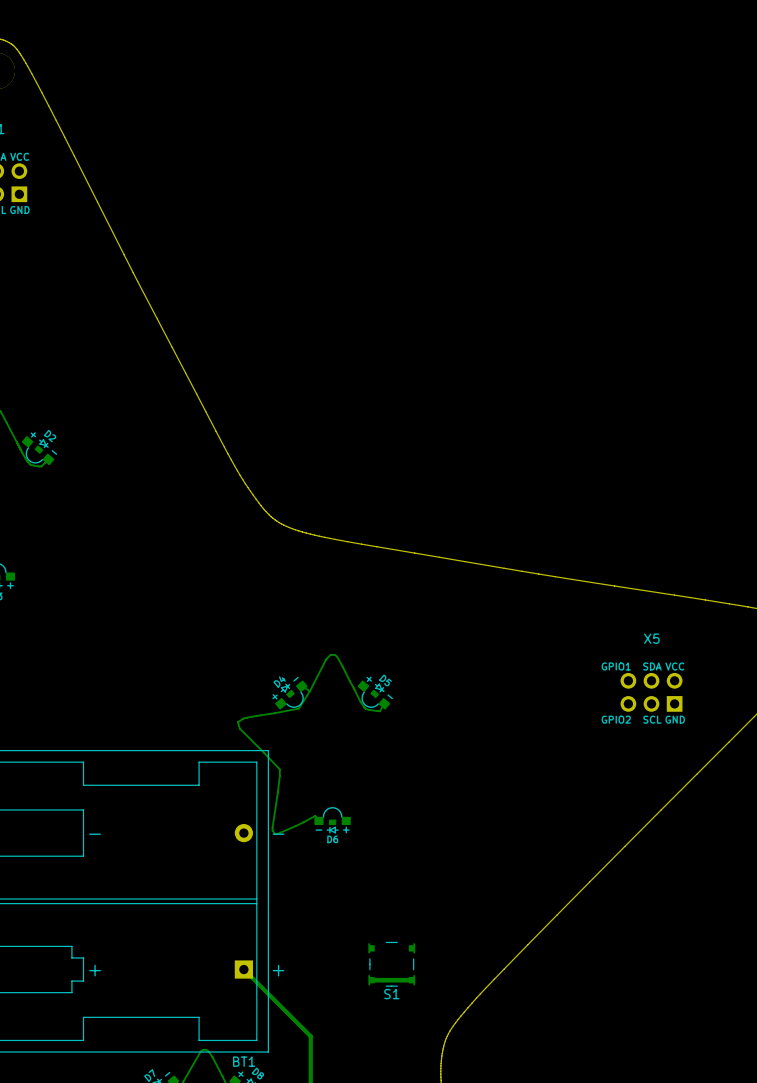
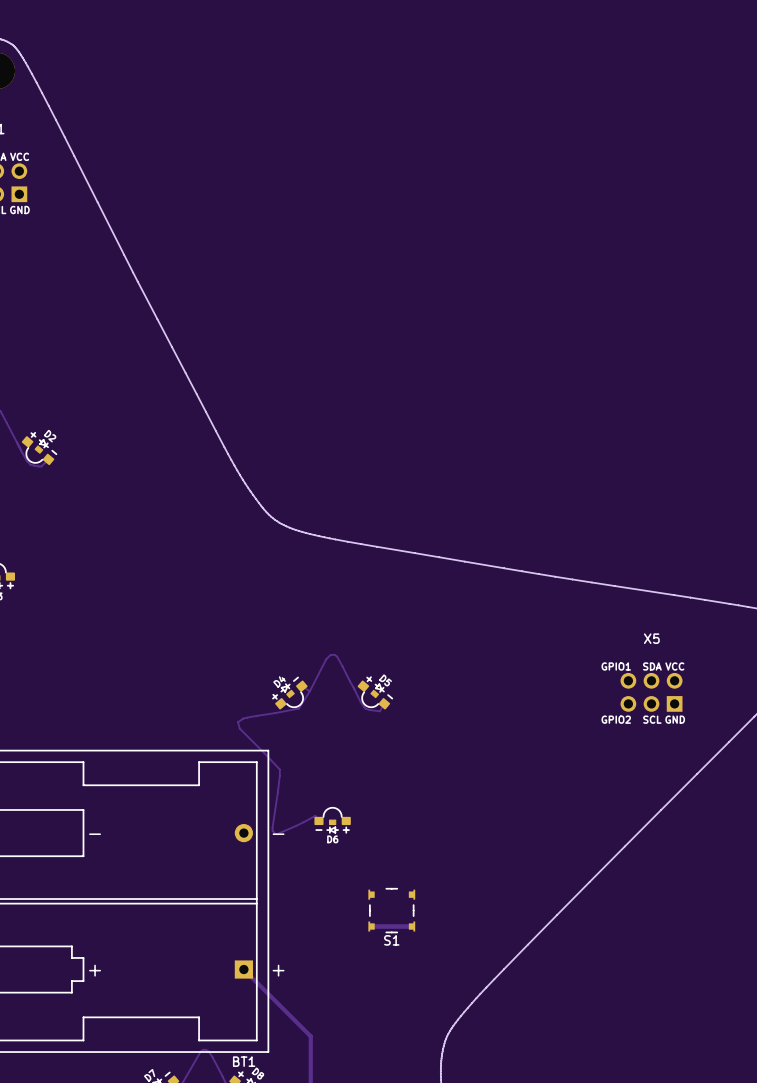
S1 position: (391, 964) -> (391, 910)
track: (411, 980) (372, 980) -> (411, 926) (372, 926)

